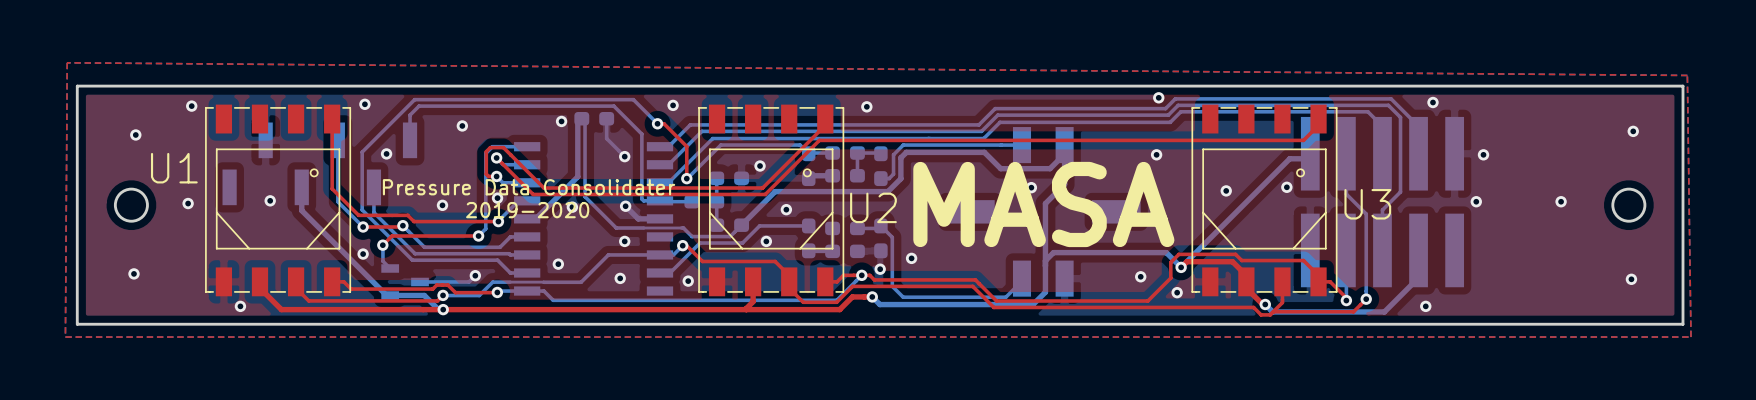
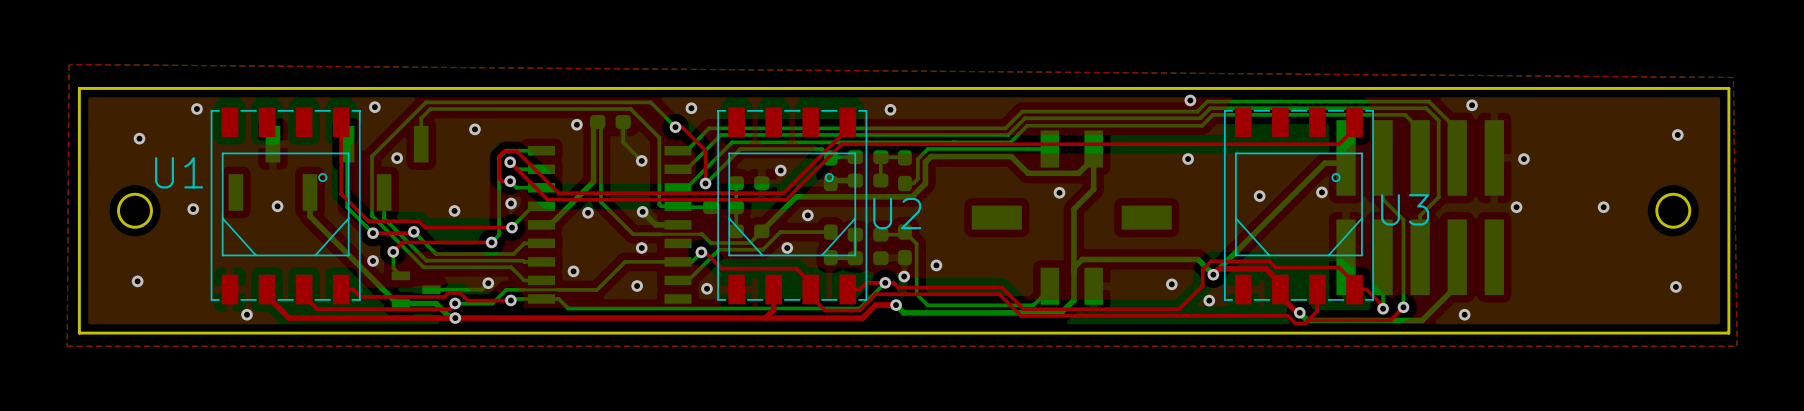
text: Pressure Data Consolidater (529, 187) -> none
text: MASA (1043, 204) -> none
text: 2019-2020 (527, 210) -> none

